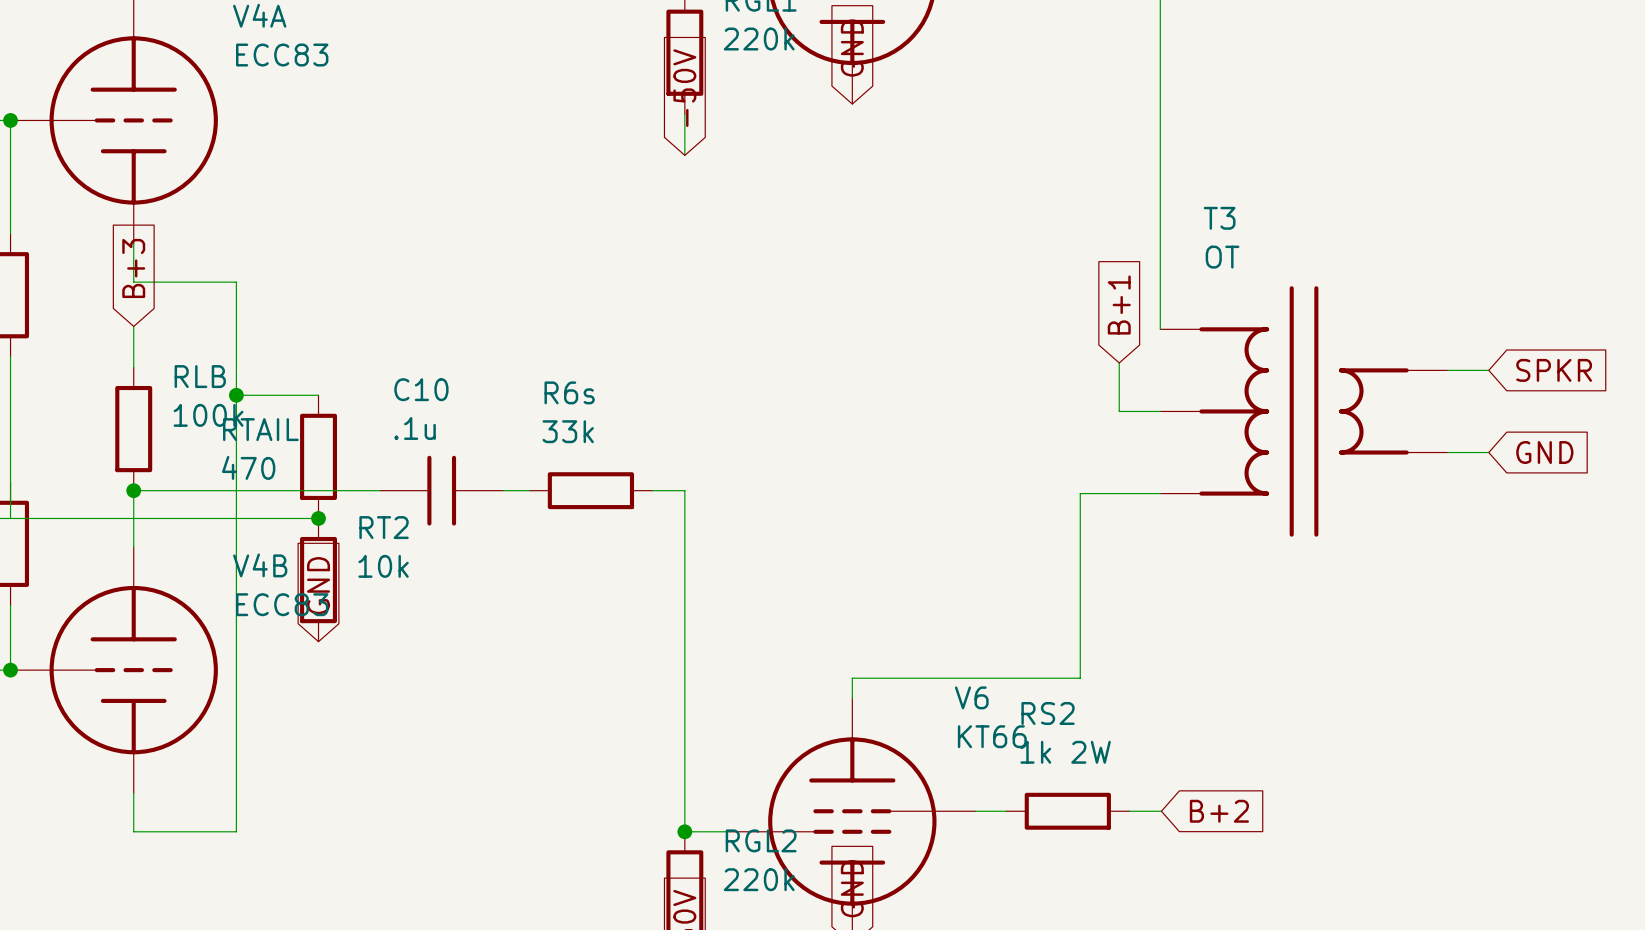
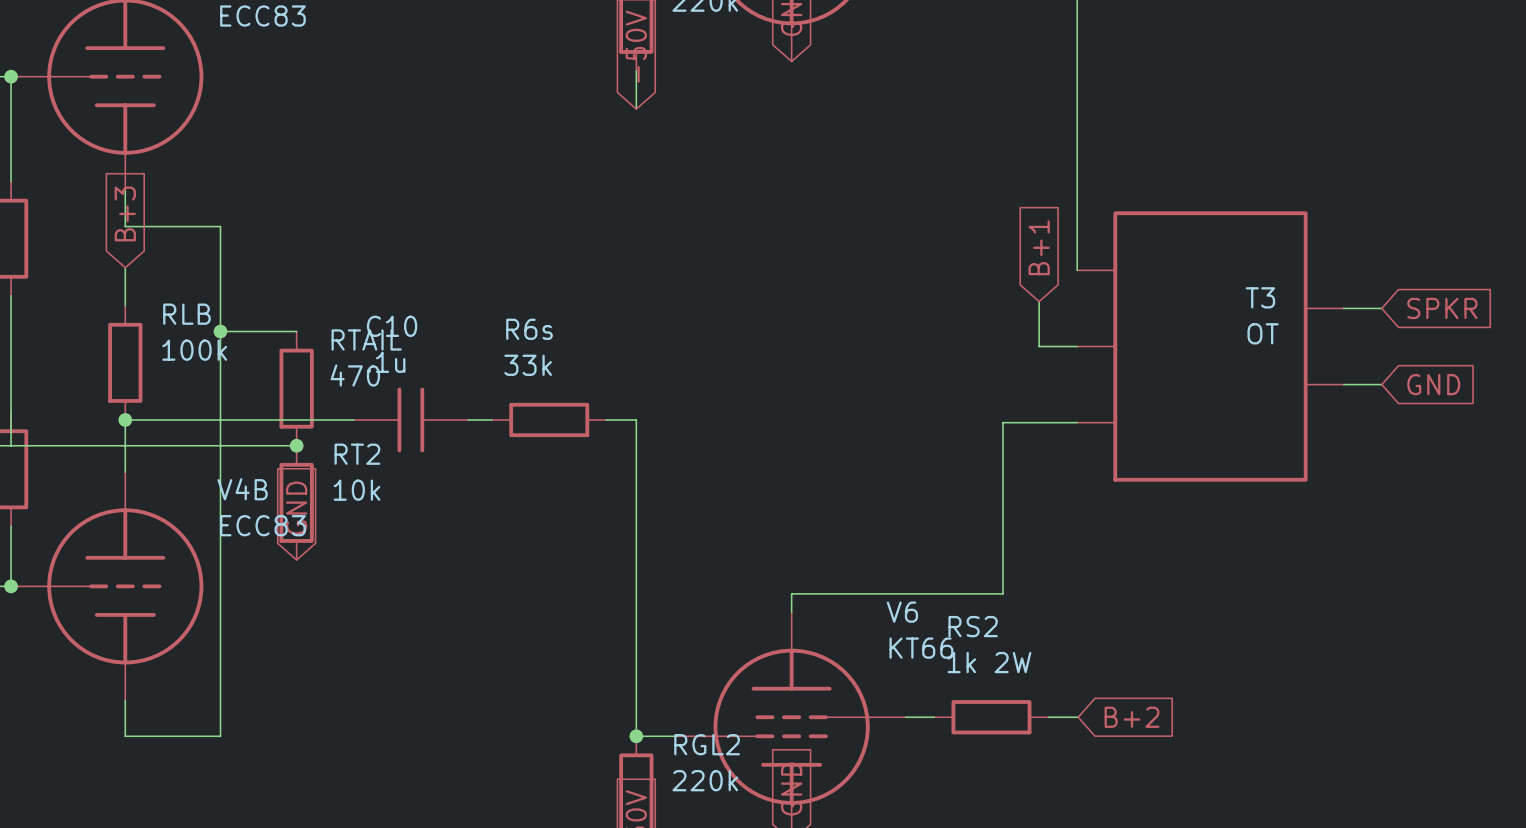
T3 name position: T3 (1219, 218) -> T3 (1260, 297)
T3 value position: OT (1222, 257) -> OT (1263, 333)
T3 symbol: [1160, 286, 1448, 537] -> [1077, 211, 1344, 482]
RTAIL name position: RTAIL (260, 429) -> RTAIL (366, 339)
RTAIL value position: 470 (248, 467) -> 470 (355, 375)

